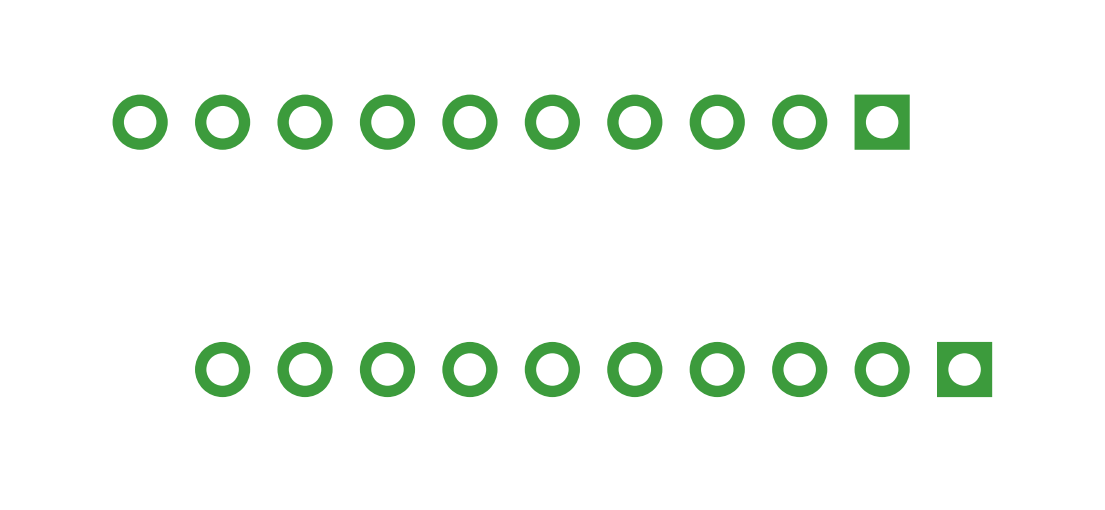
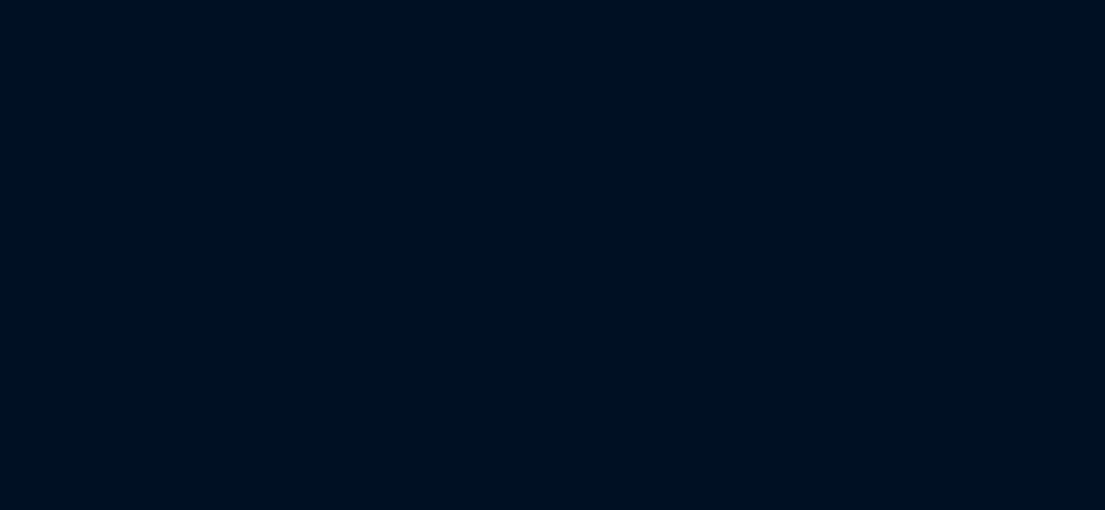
part: (511, 122) -> none
part: (593, 369) -> none

